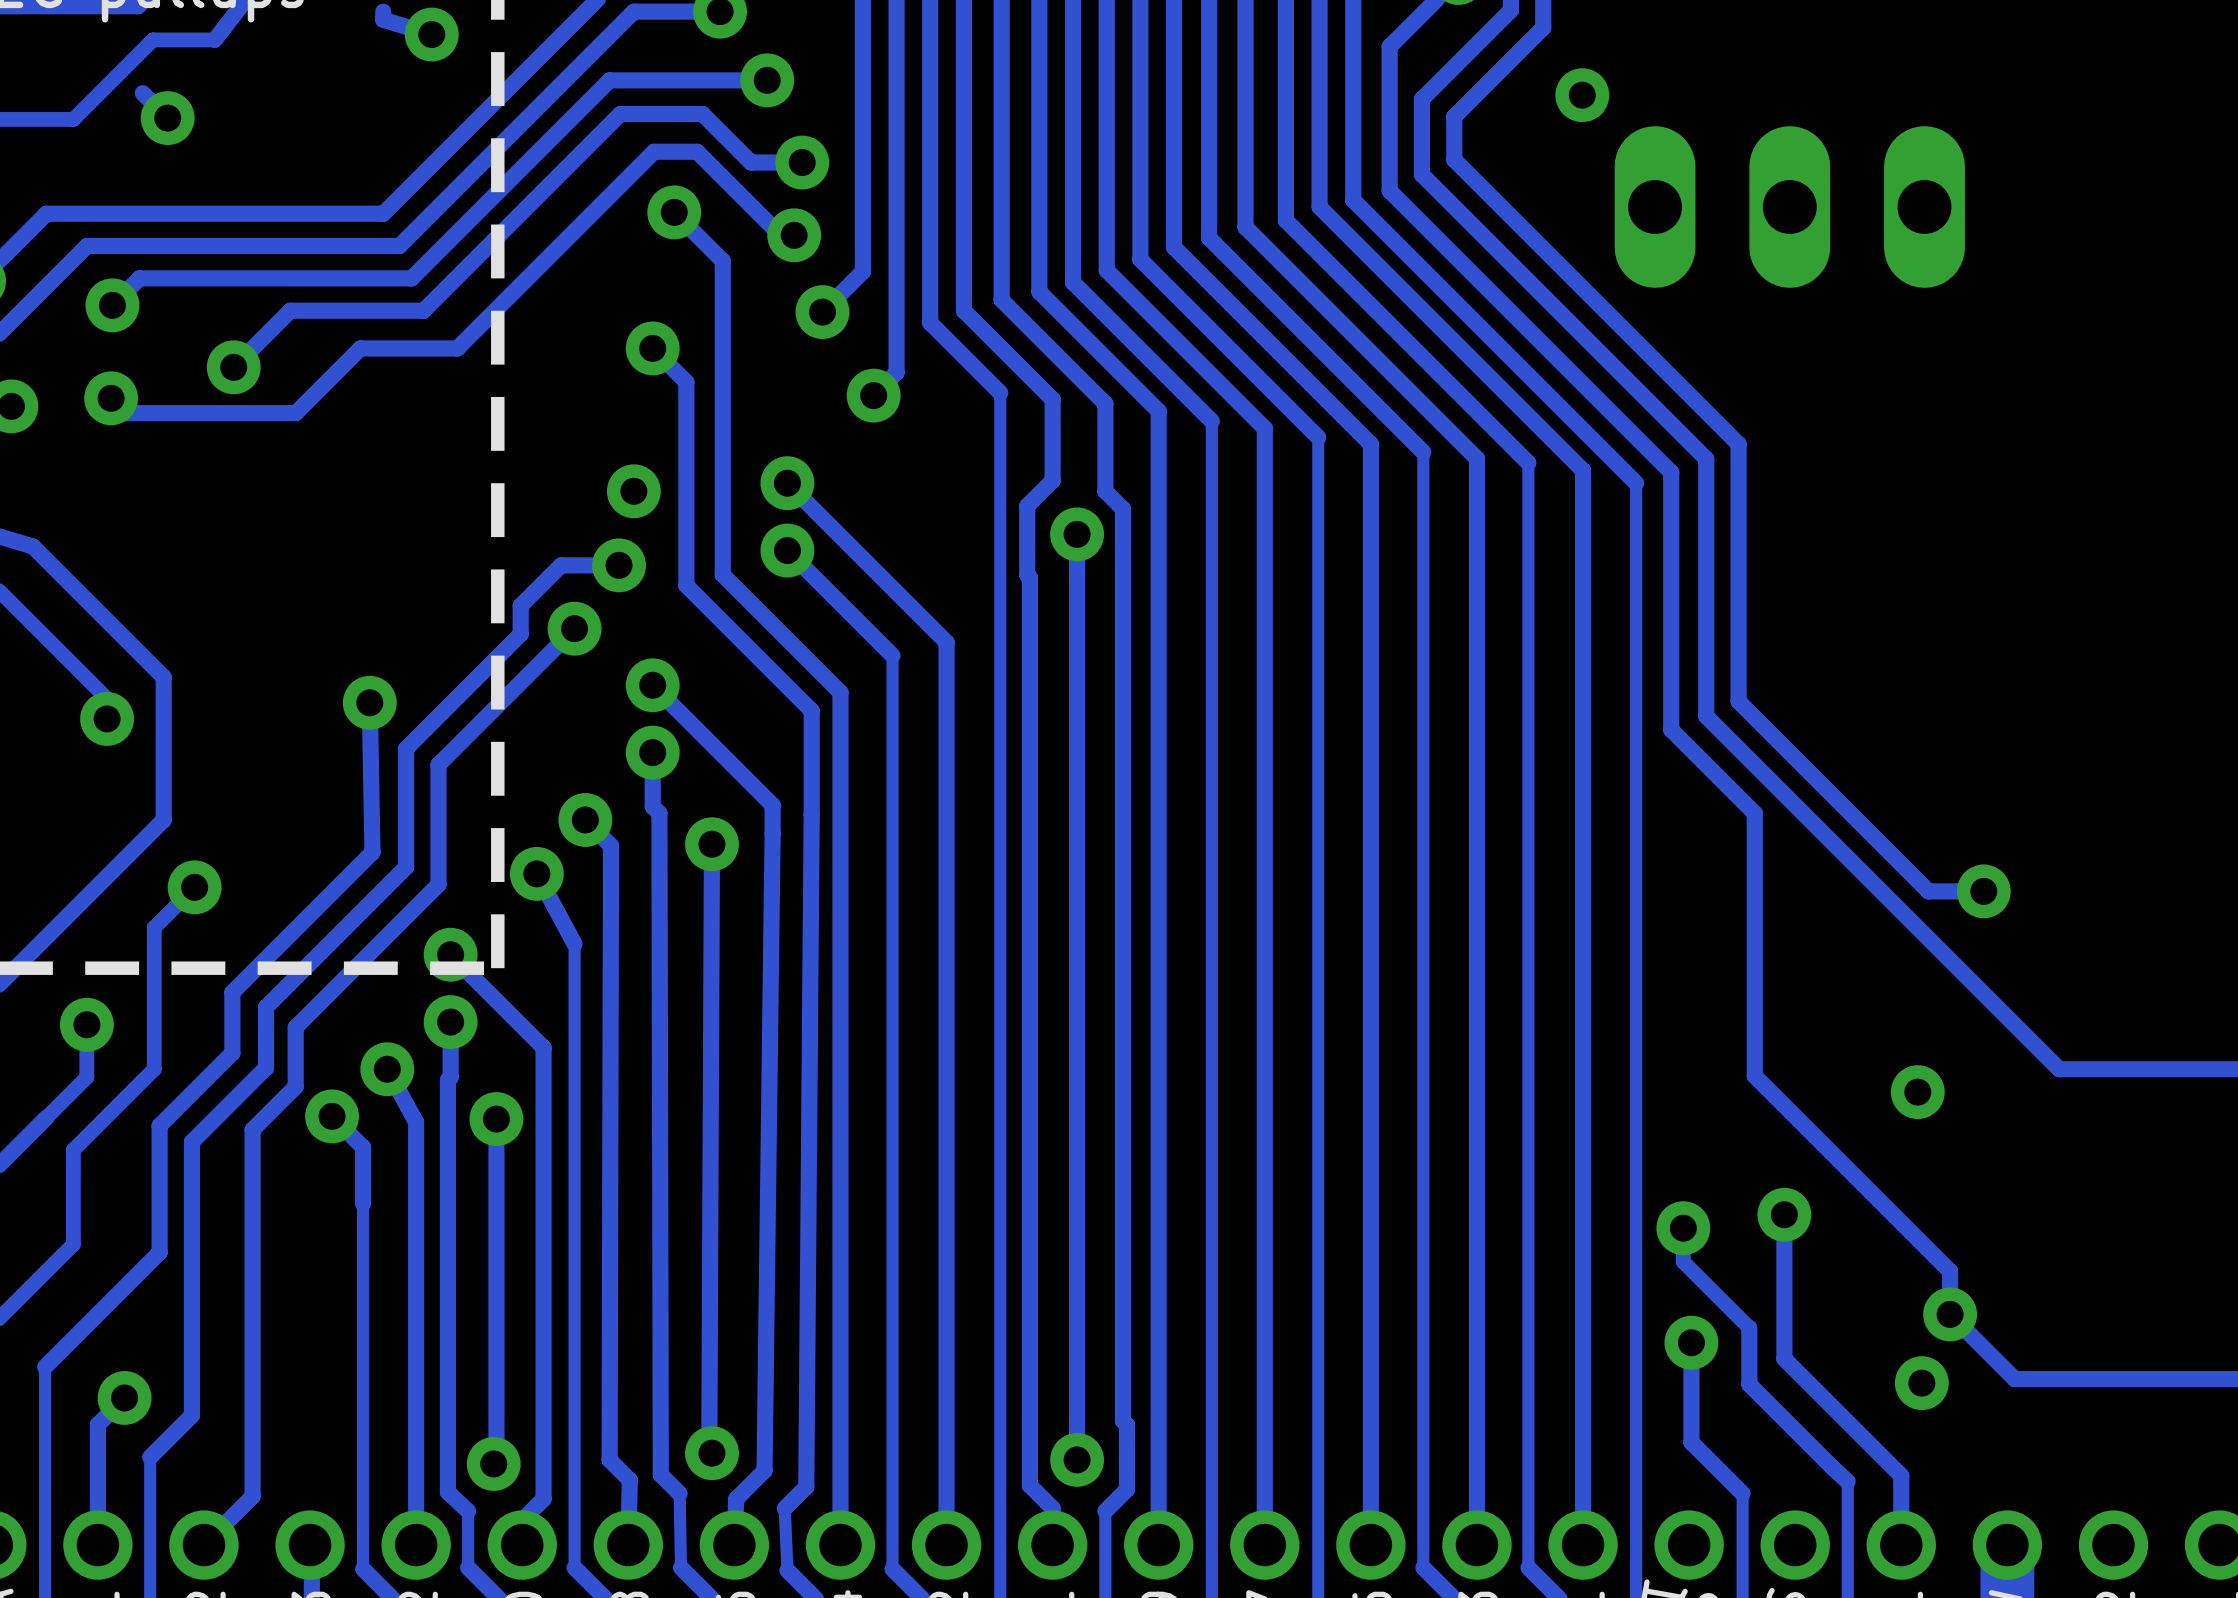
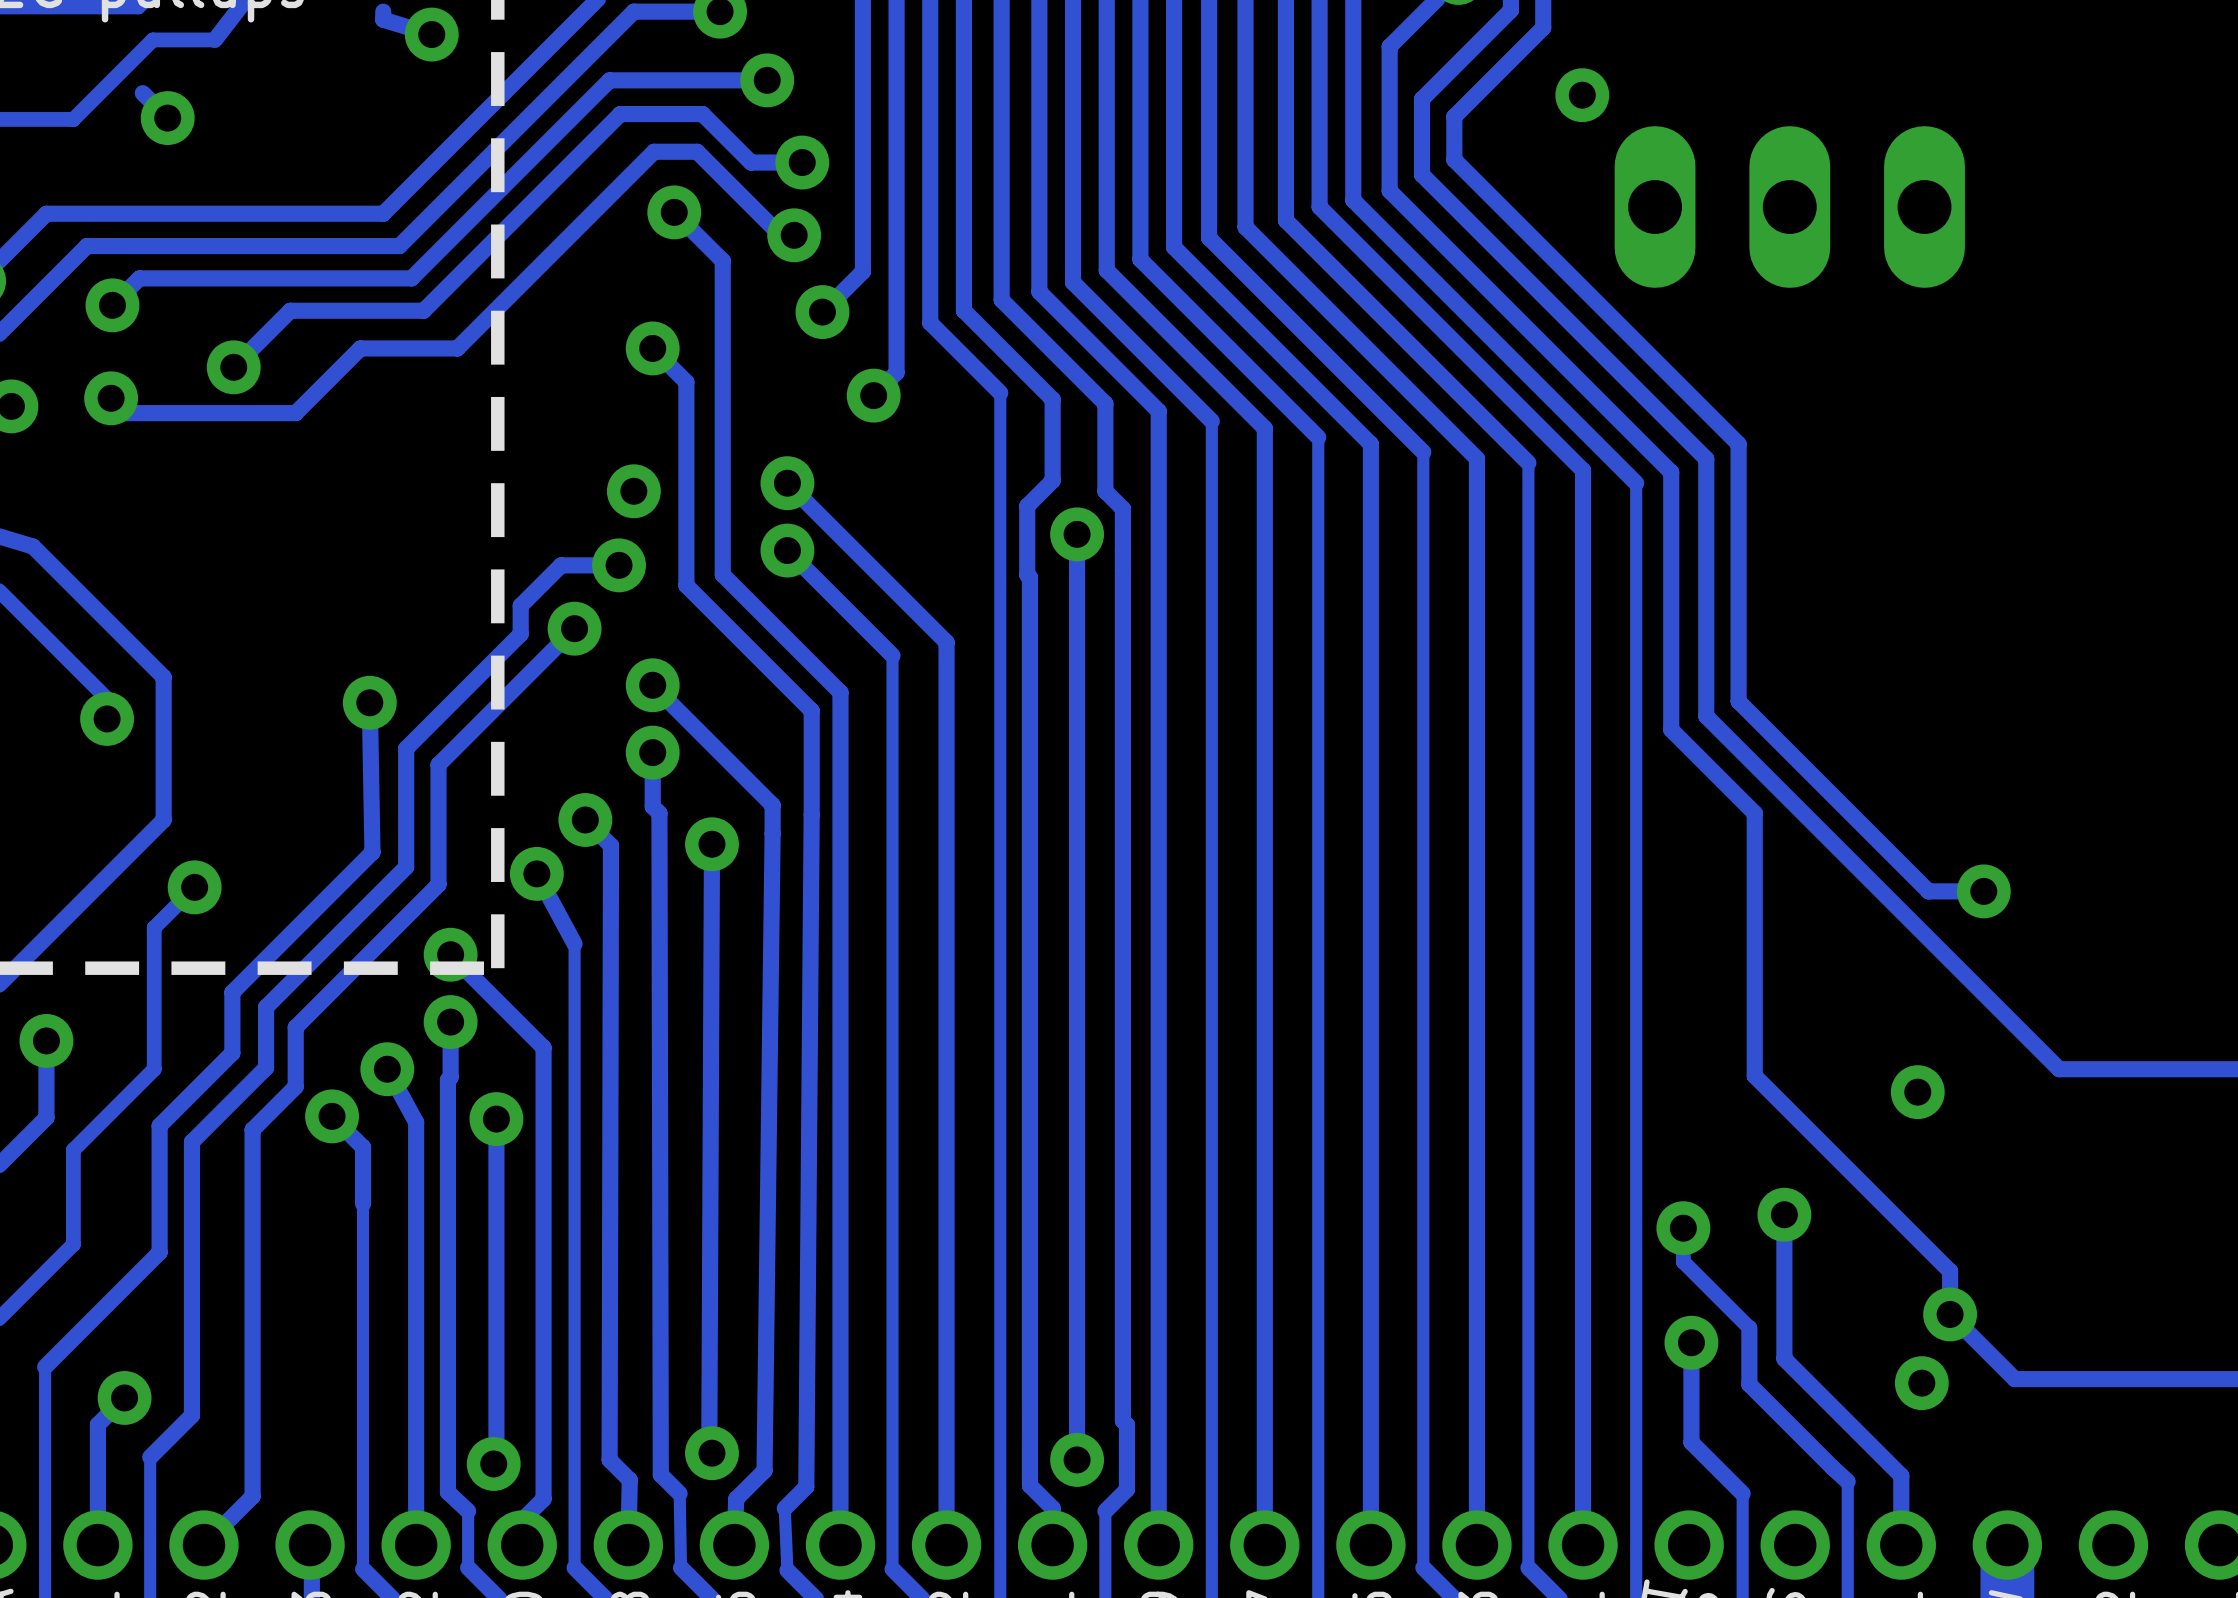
track: (86, 1024) (86, 1077) (46, 1117) -> (46, 1040) (46, 1117)
via position: (86, 1024) -> (46, 1040)

